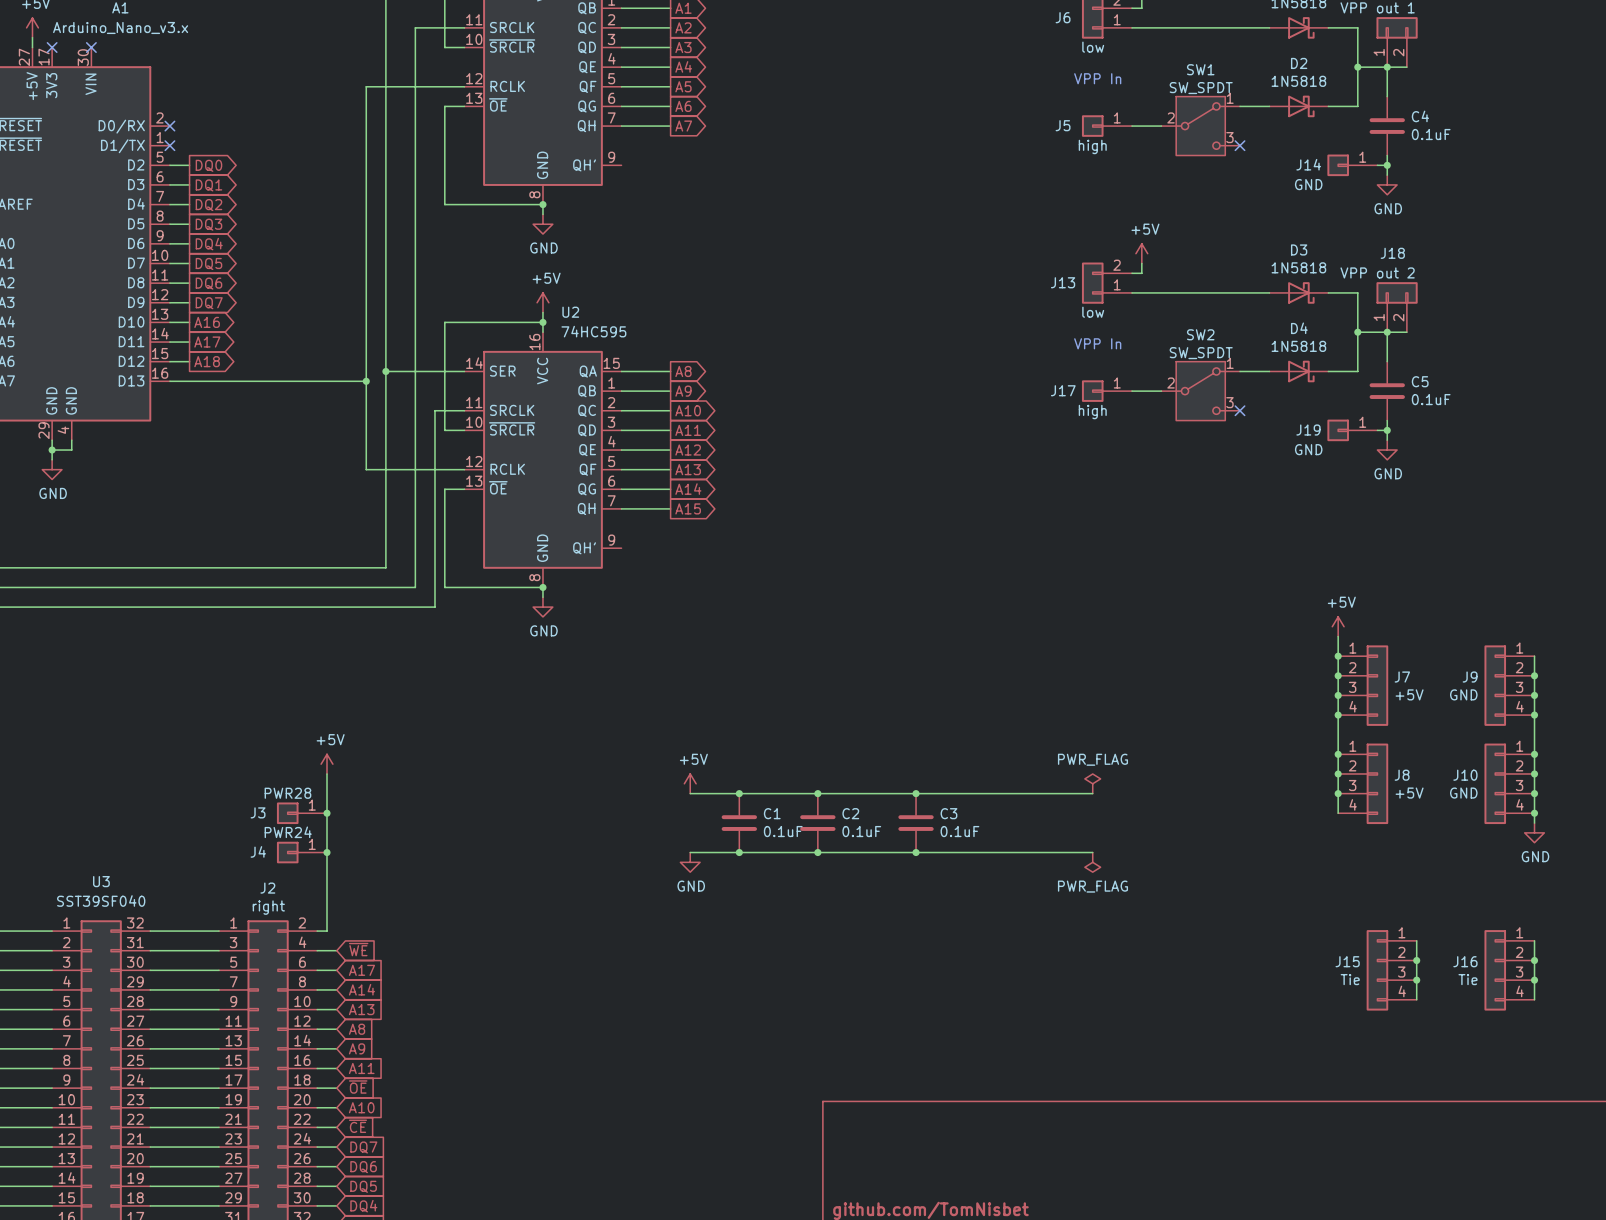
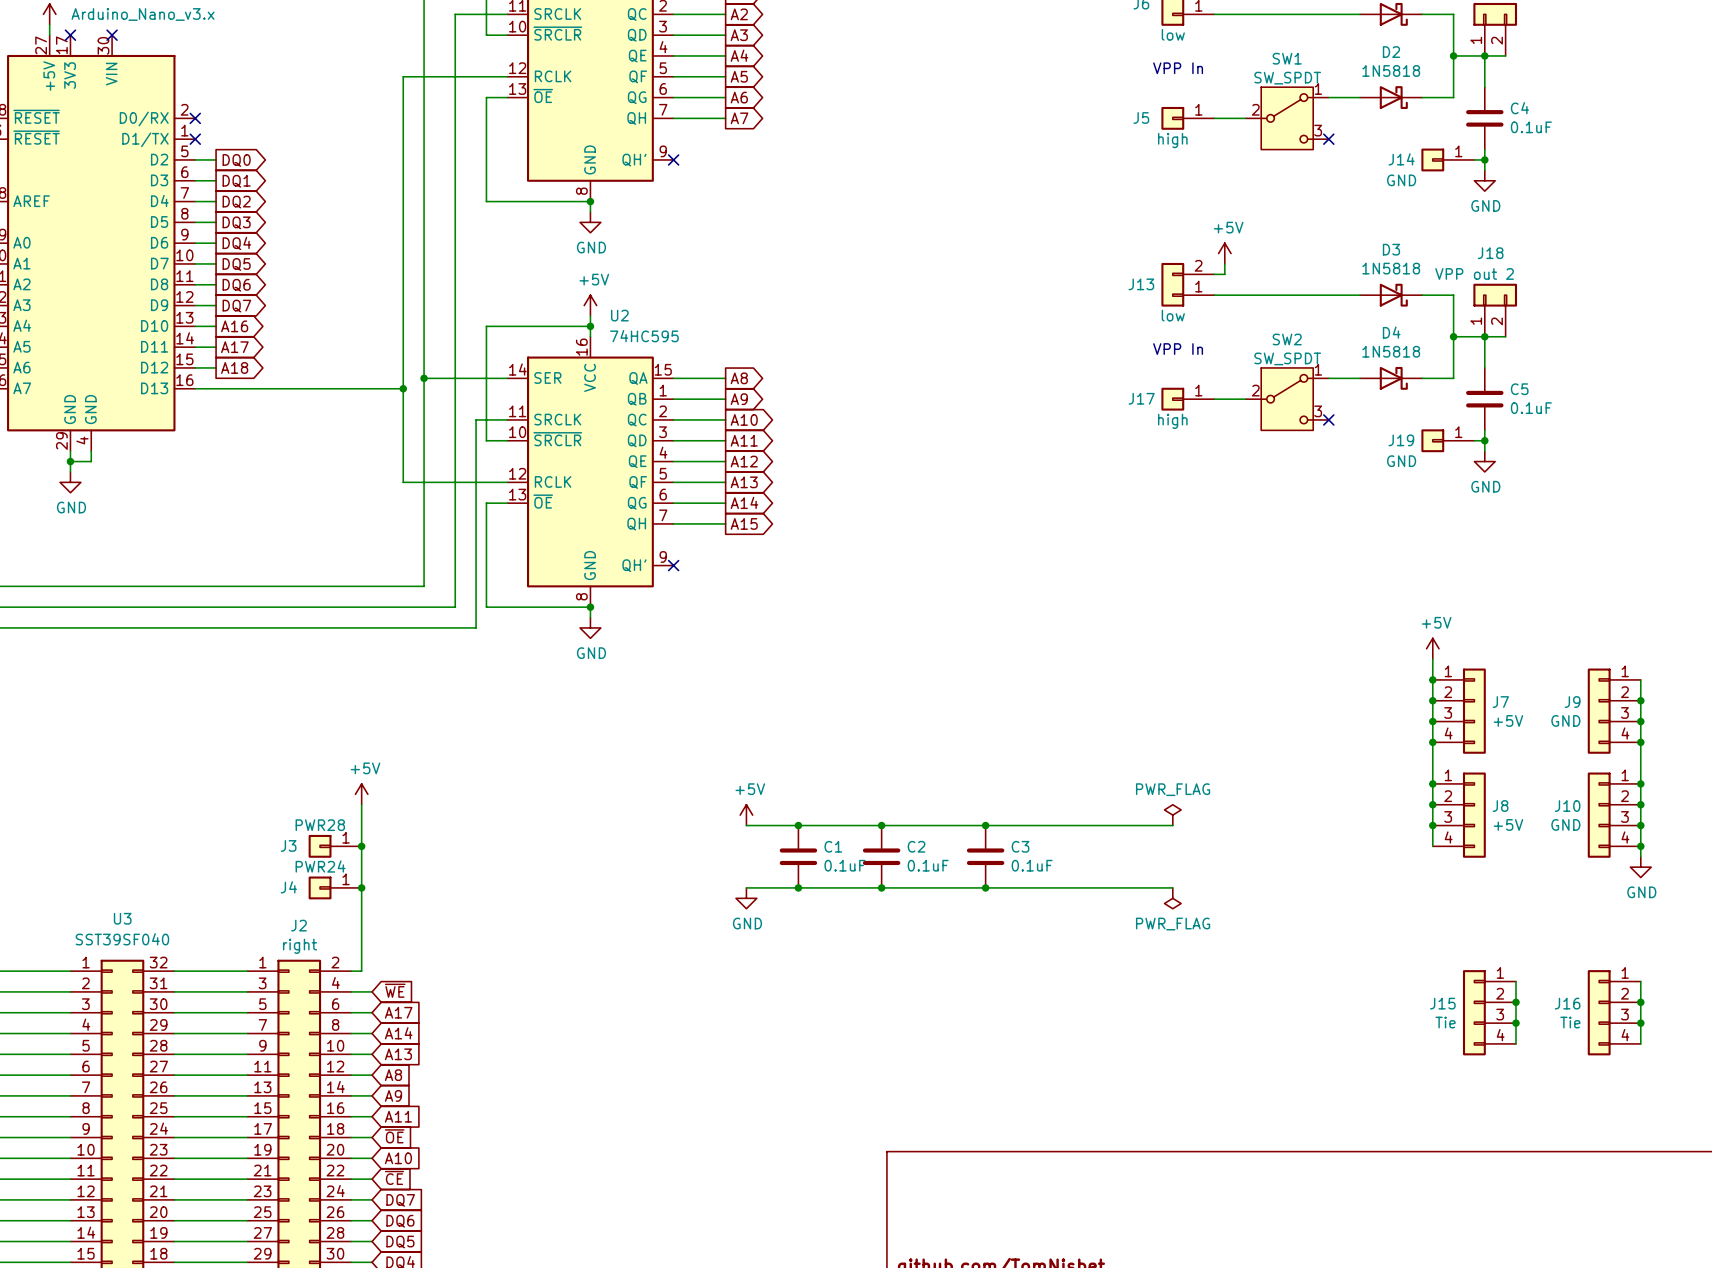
no-connect mark: none -> (673, 159)
no-connect mark: none -> (673, 565)

